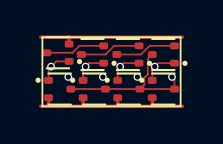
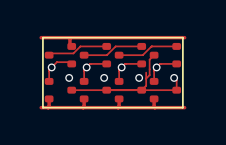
part footprint: [42, 36, 83, 70] -> [44, 42, 77, 68]
part footprint: [76, 37, 117, 72] -> [79, 42, 112, 68]
part footprint: [112, 37, 153, 72] -> [114, 42, 147, 68]
part footprint: [147, 37, 188, 72] -> [149, 42, 182, 68]
part footprint: [35, 72, 76, 106] -> [44, 77, 77, 103]
part footprint: [70, 72, 110, 106] -> [79, 77, 112, 103]
part footprint: [104, 72, 145, 106] -> [114, 77, 147, 103]
part footprint: [139, 72, 179, 106] -> [149, 77, 182, 103]

